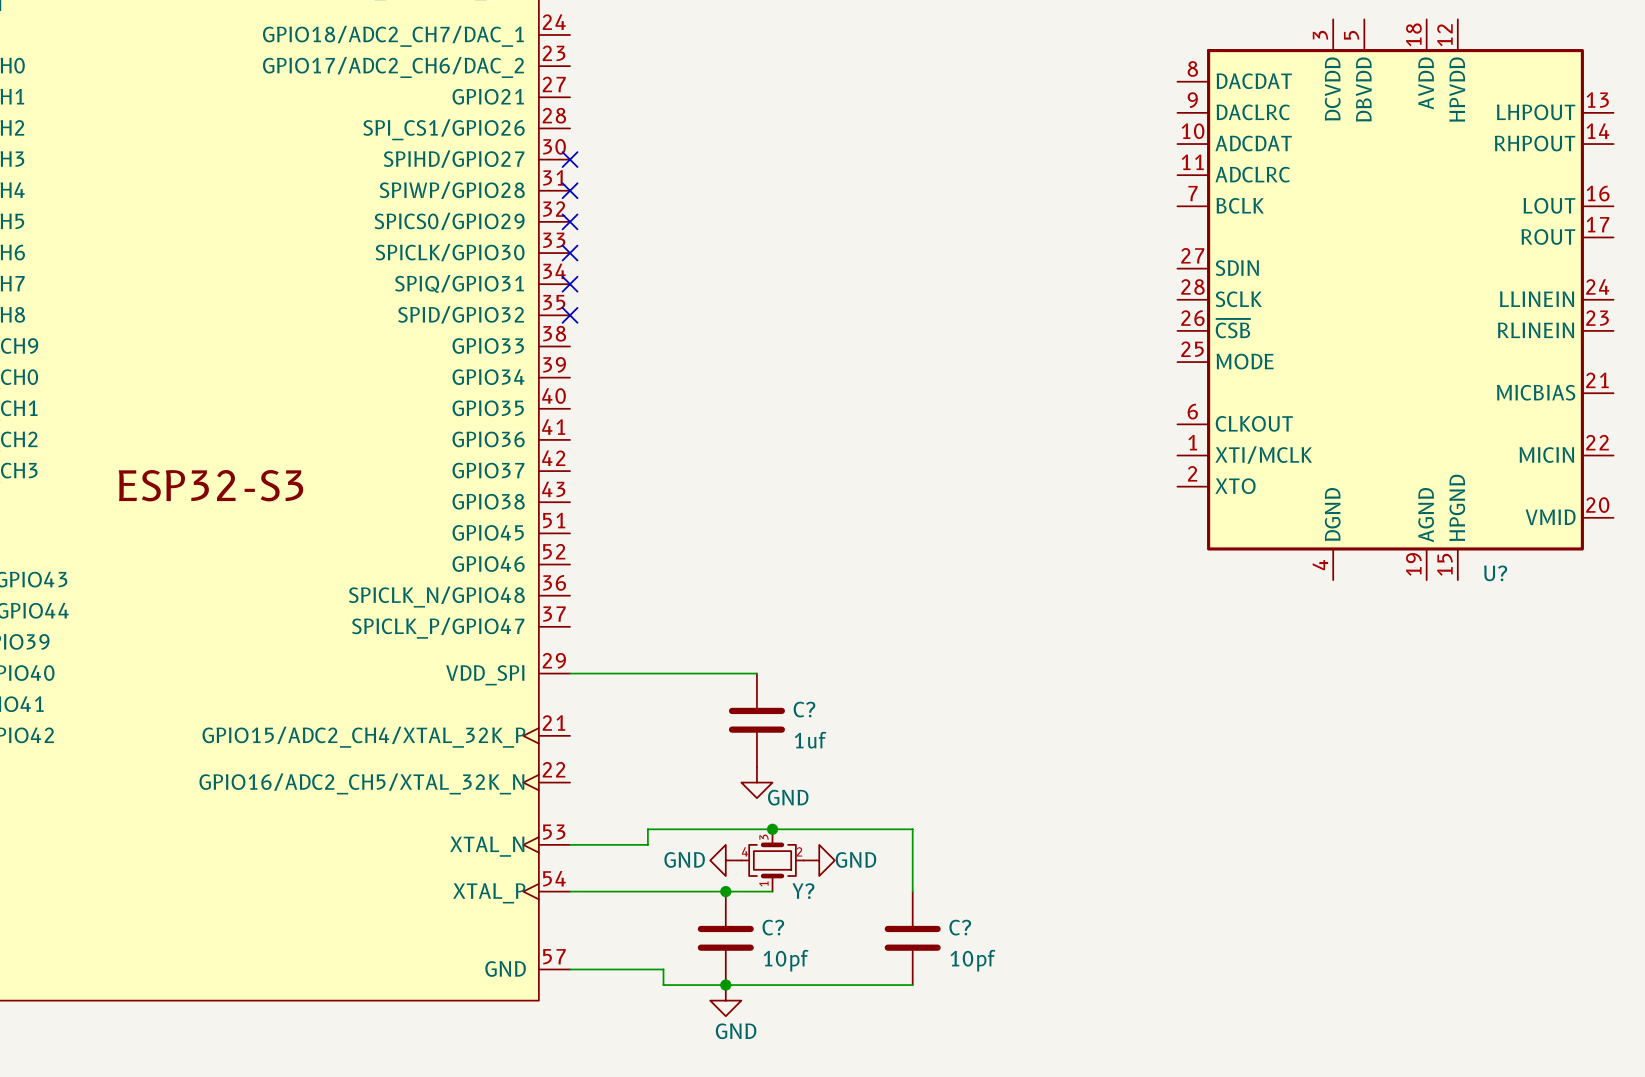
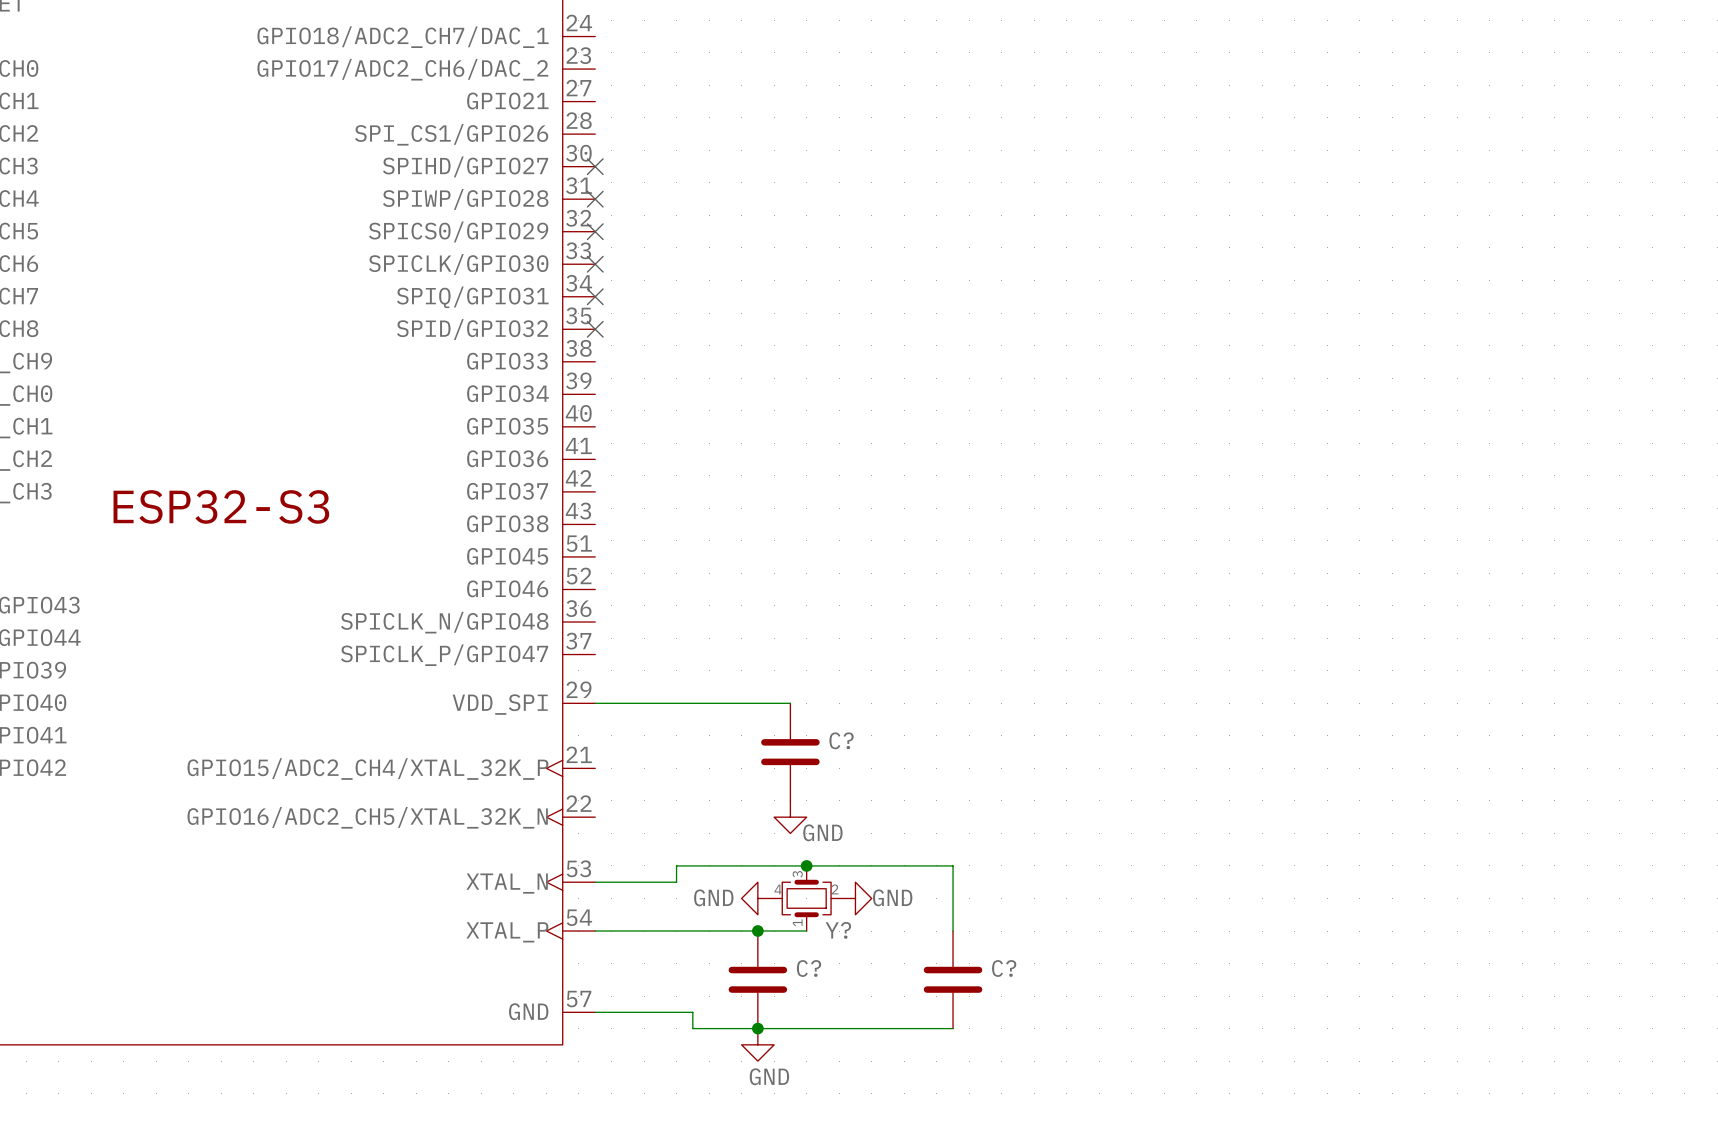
U?: (1395, 299) -> none
C? value: 1uf (810, 740) -> none
C? value: 10pf (786, 960) -> none
C? value: 10pf (973, 960) -> none

